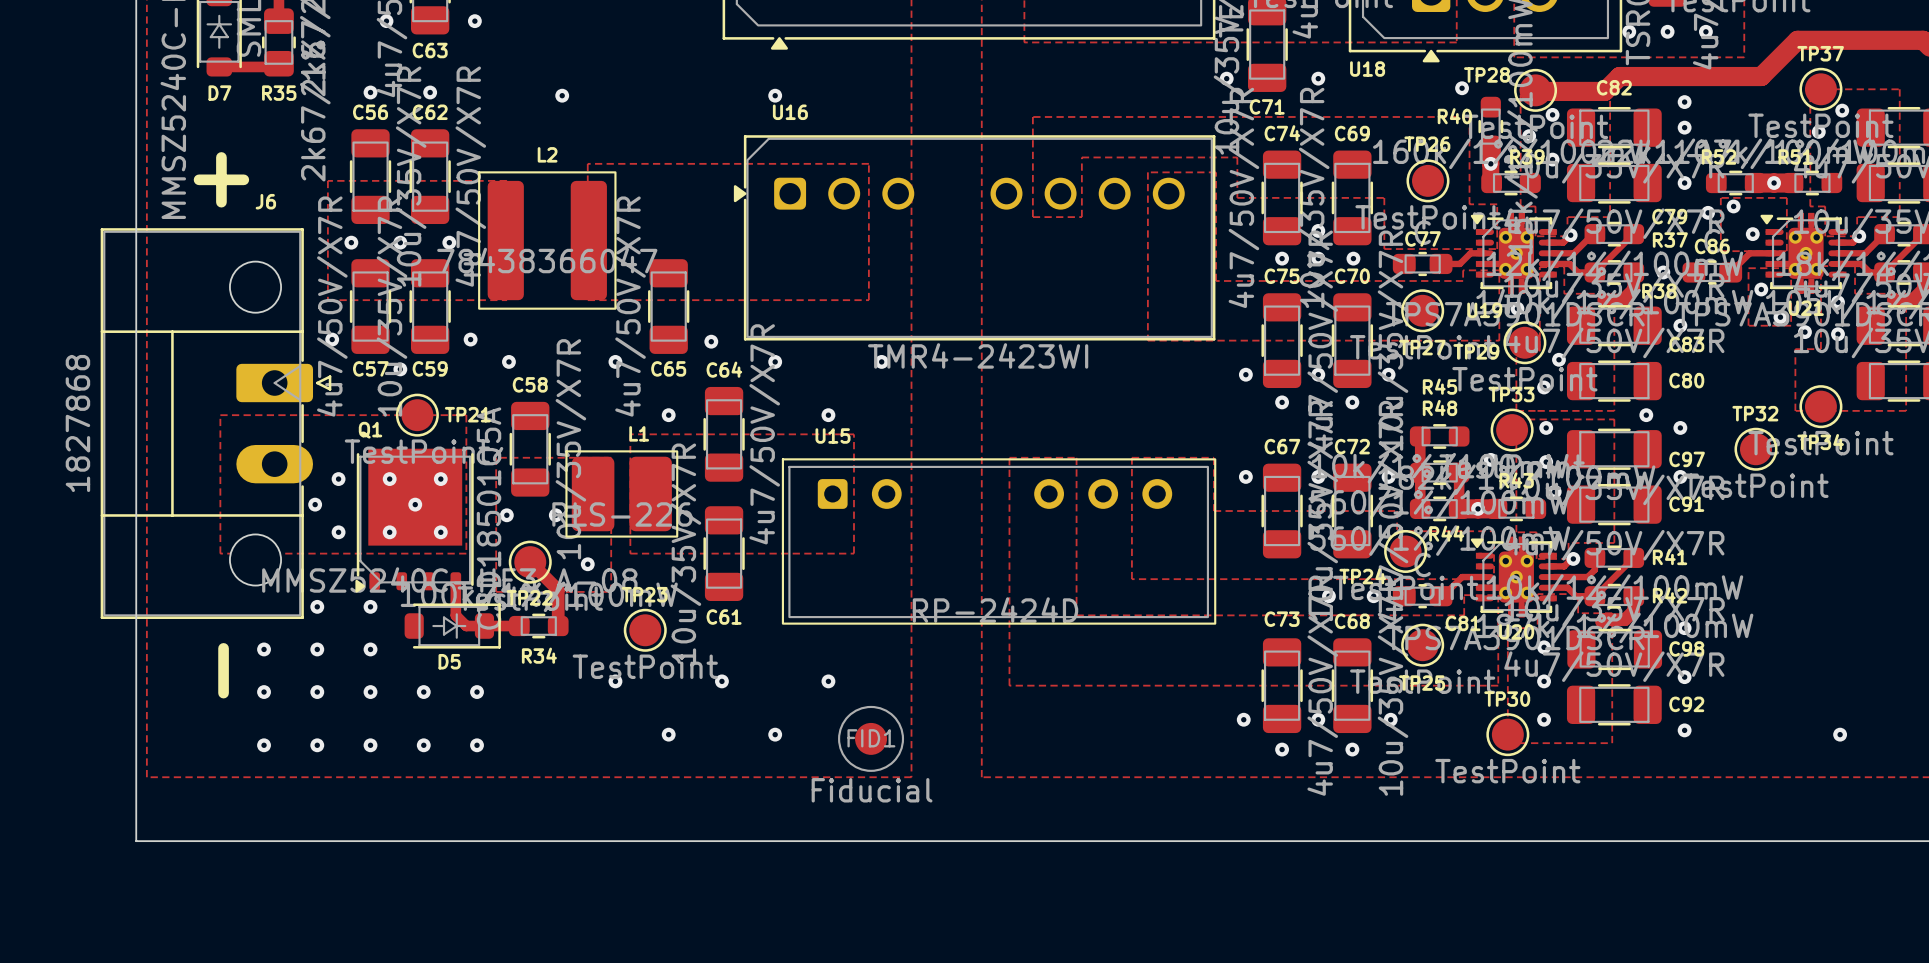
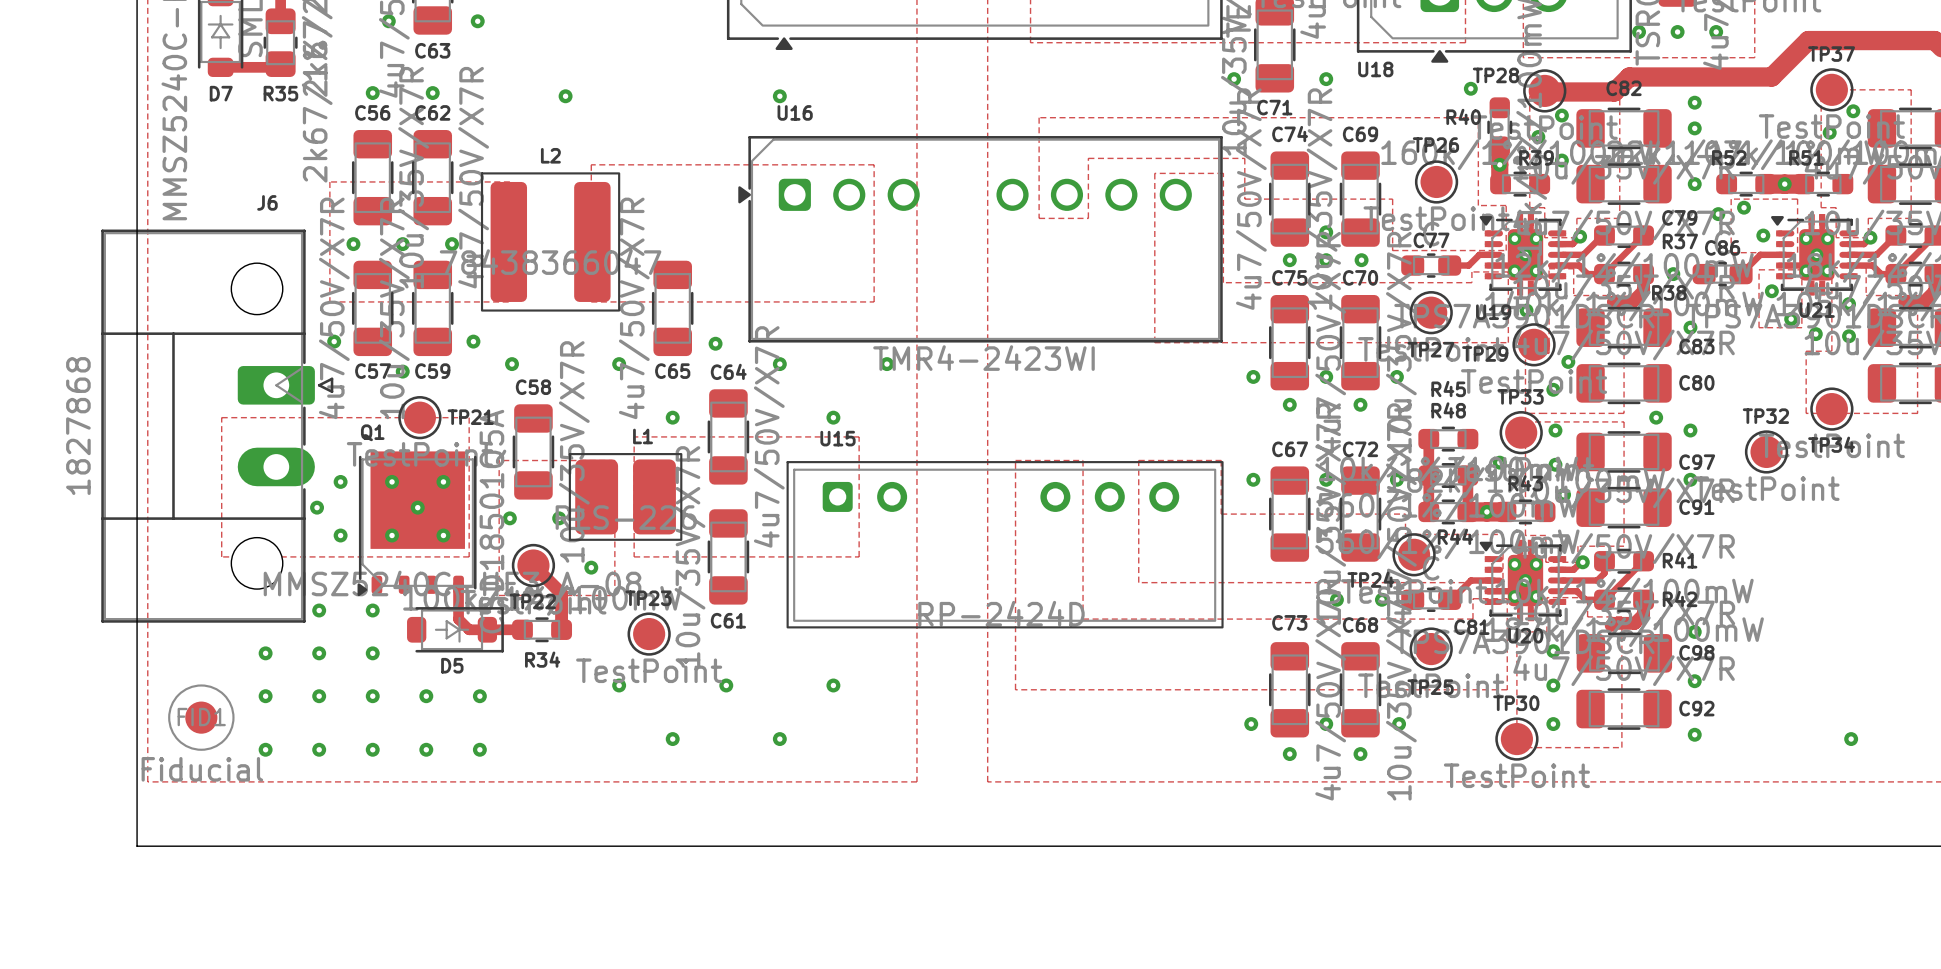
line: (221, 157) (221, 202) -> none
line: (199, 179) (243, 179) -> none
line: (223, 648) (223, 693) -> none
FID1 position: (871, 738) -> (201, 717)

